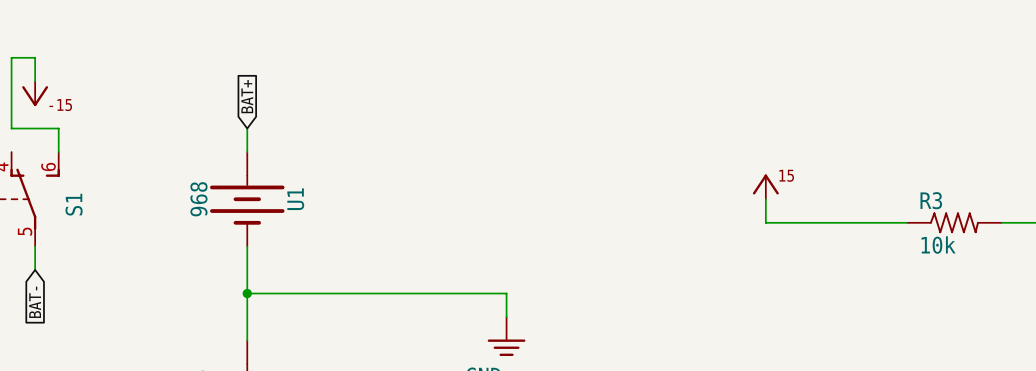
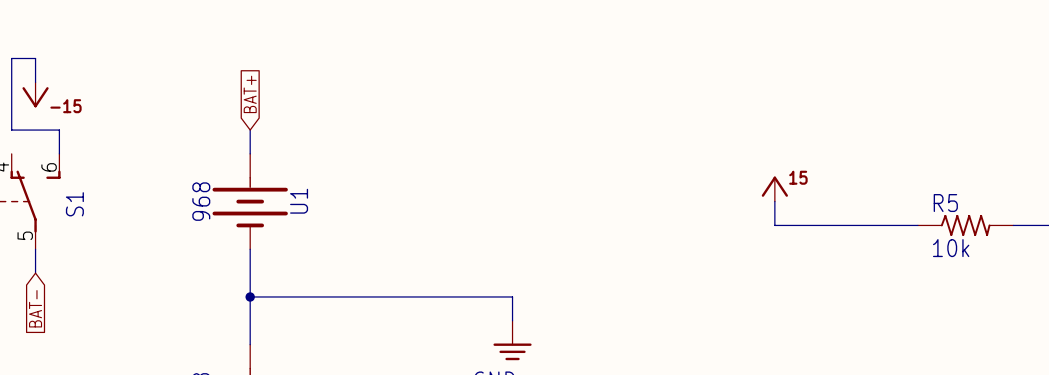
R3 name: R3 (931, 200) -> R5 (945, 203)

